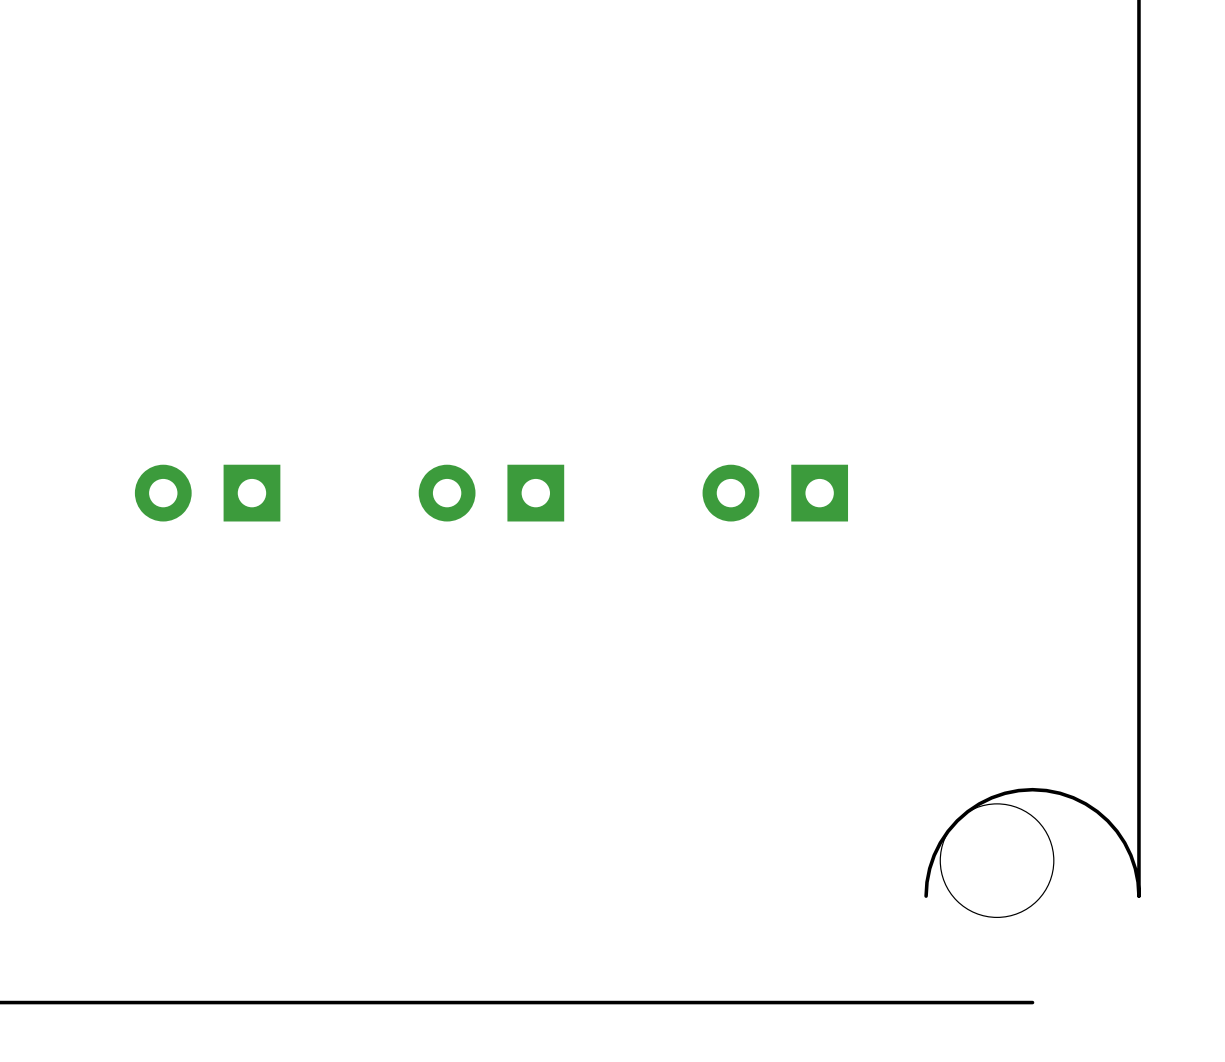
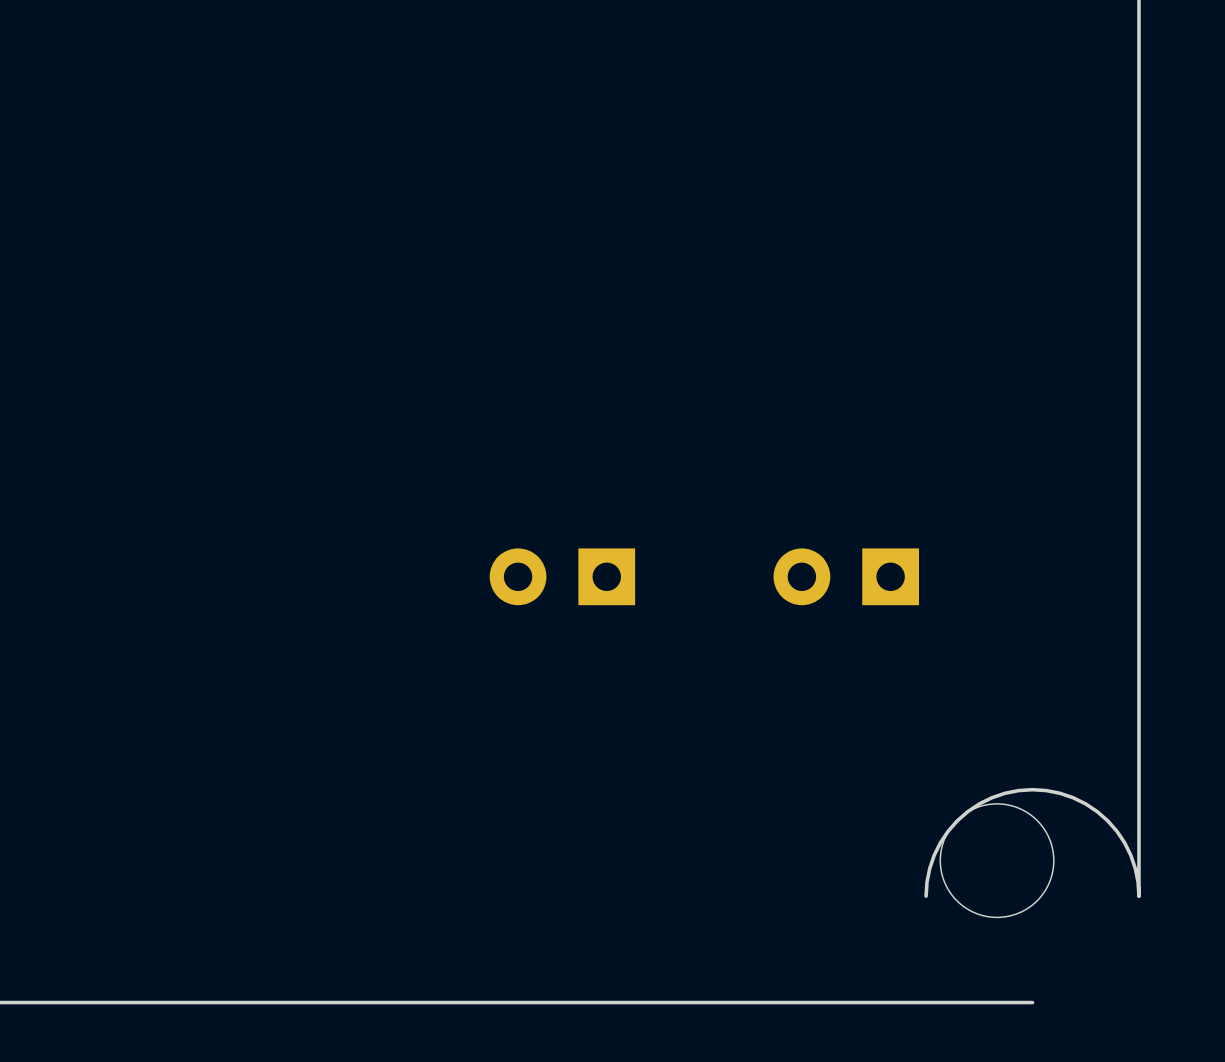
part: (207, 493) -> none
part position: (491, 493) -> (562, 576)
part position: (775, 493) -> (846, 576)

